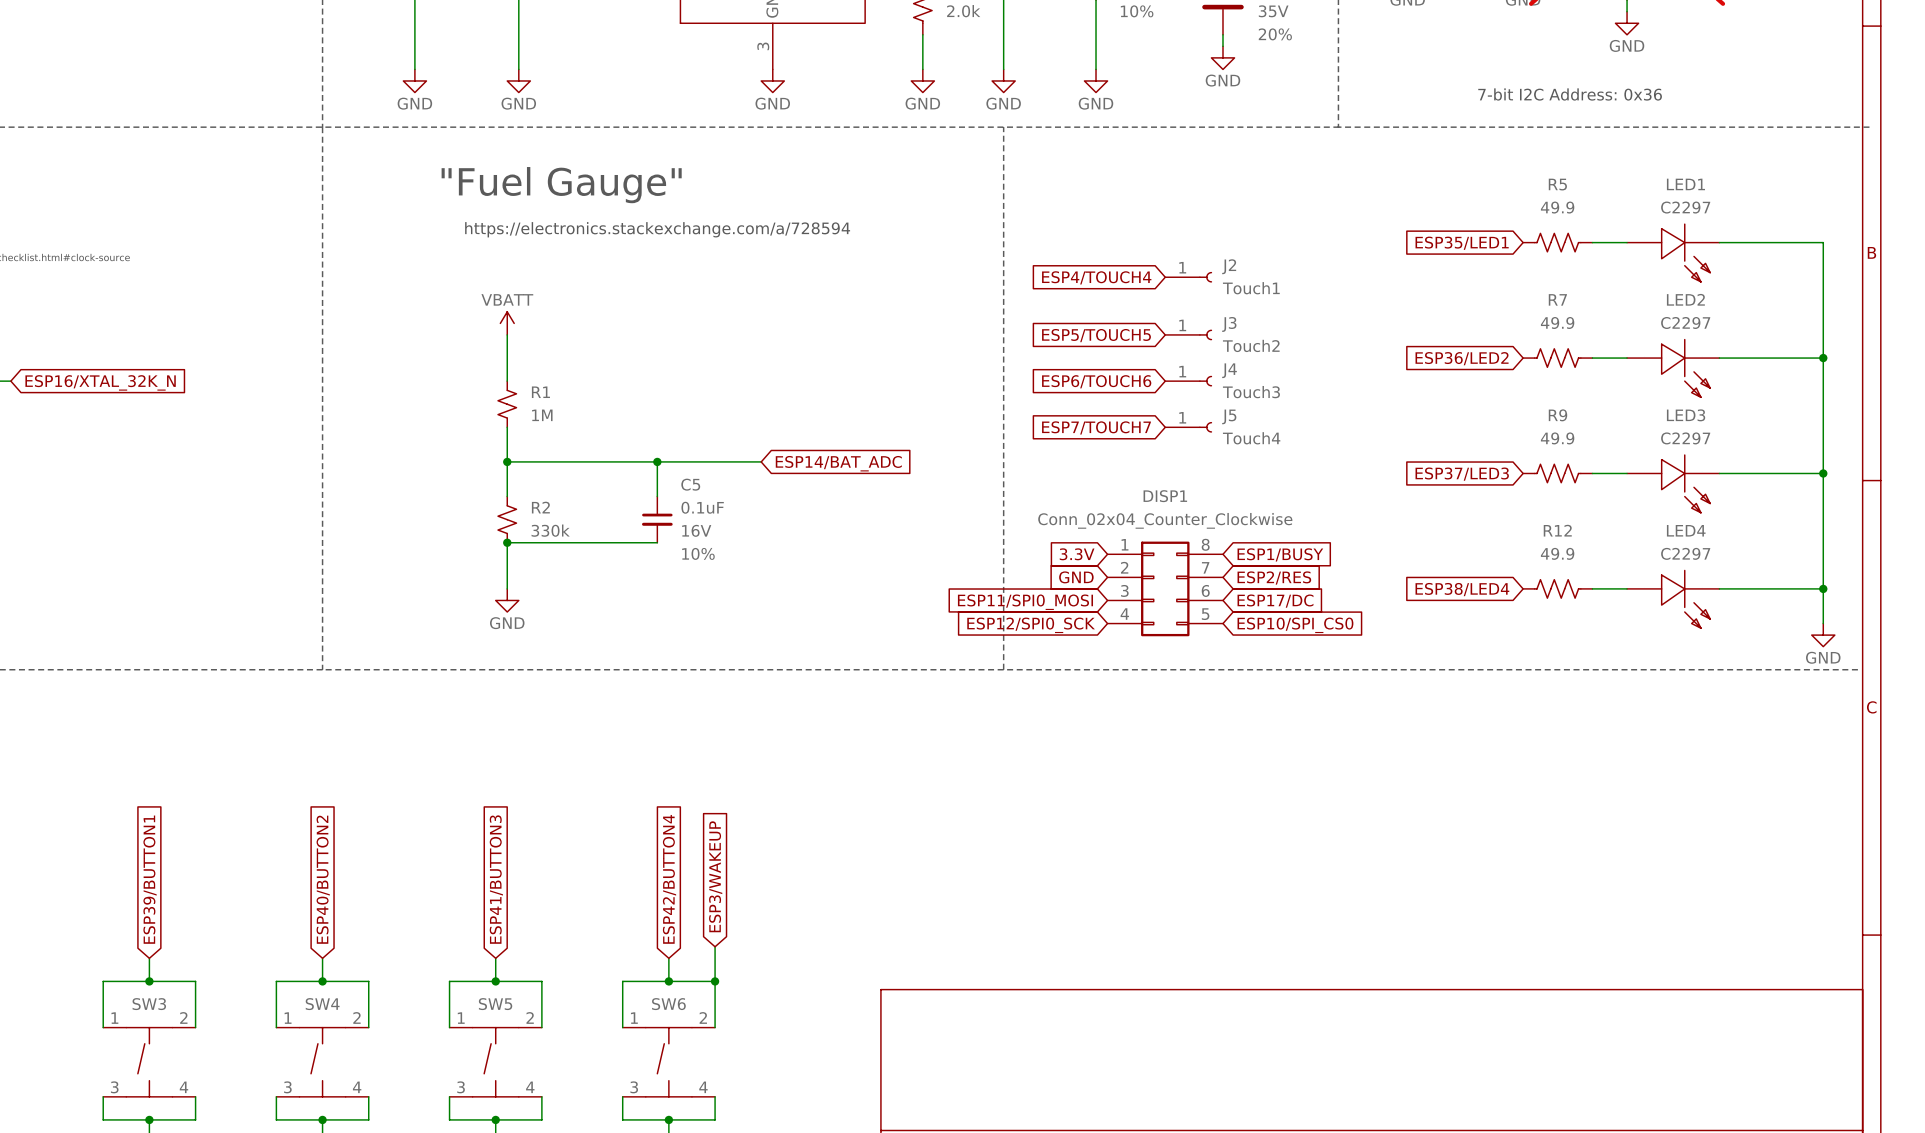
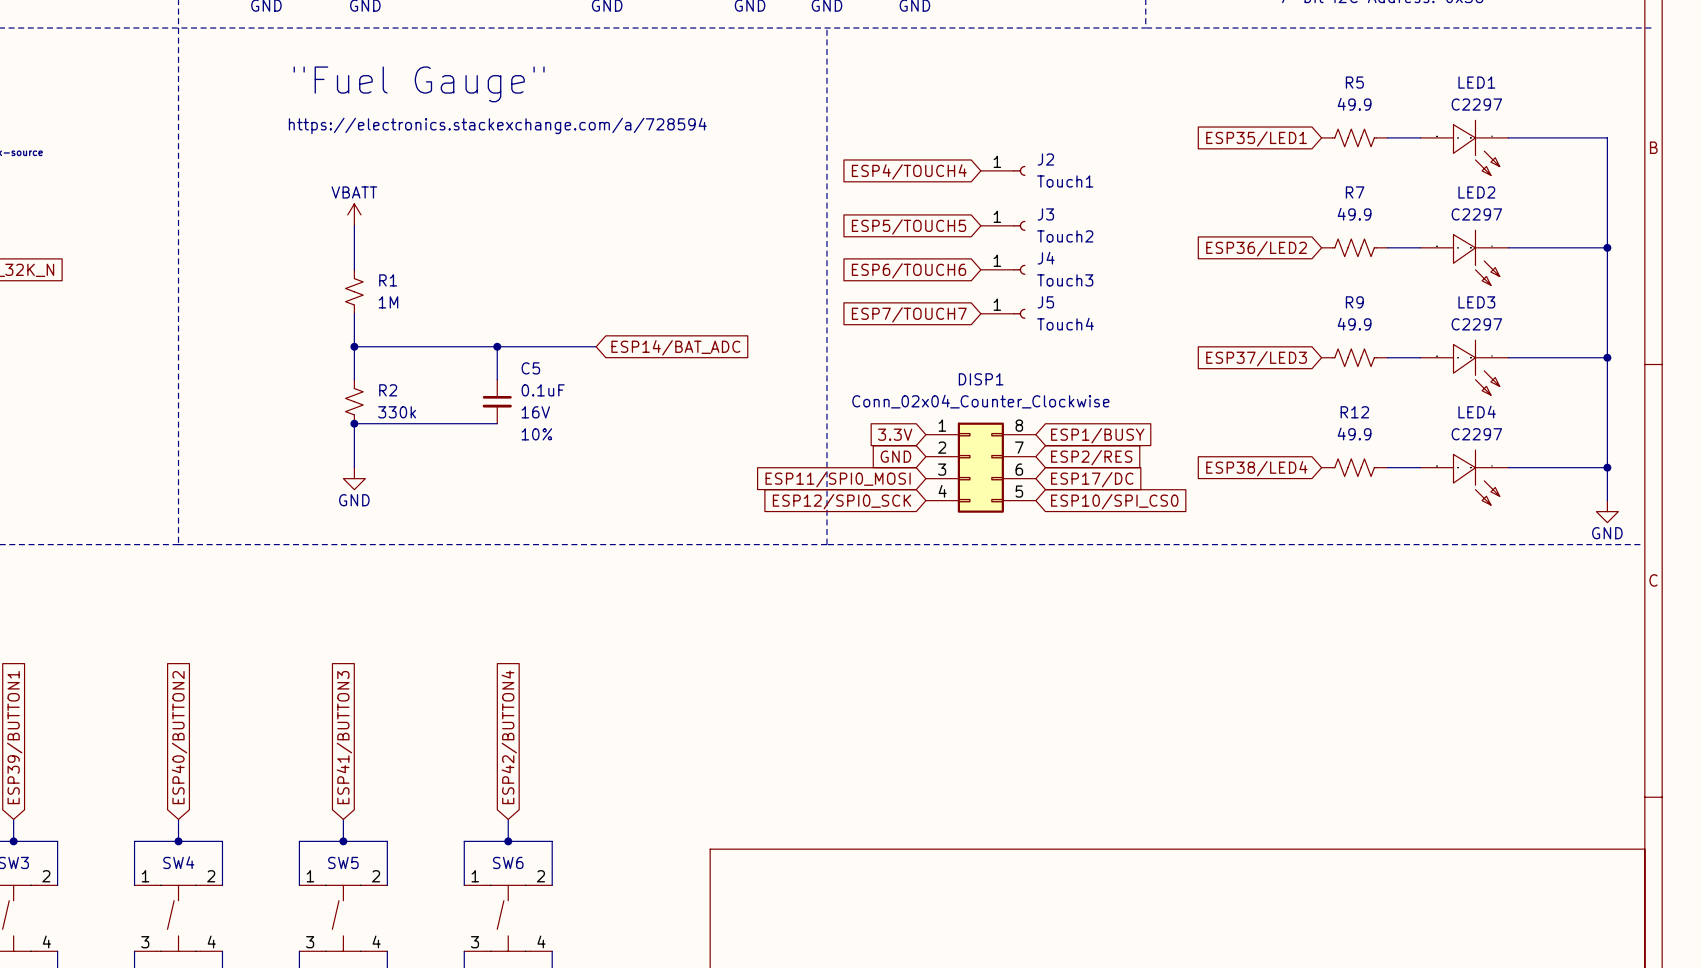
global label: ESP3/WAKEUP (715, 876) -> none
wire: (715, 946) (715, 981) -> none
junction: (715, 981) -> none

